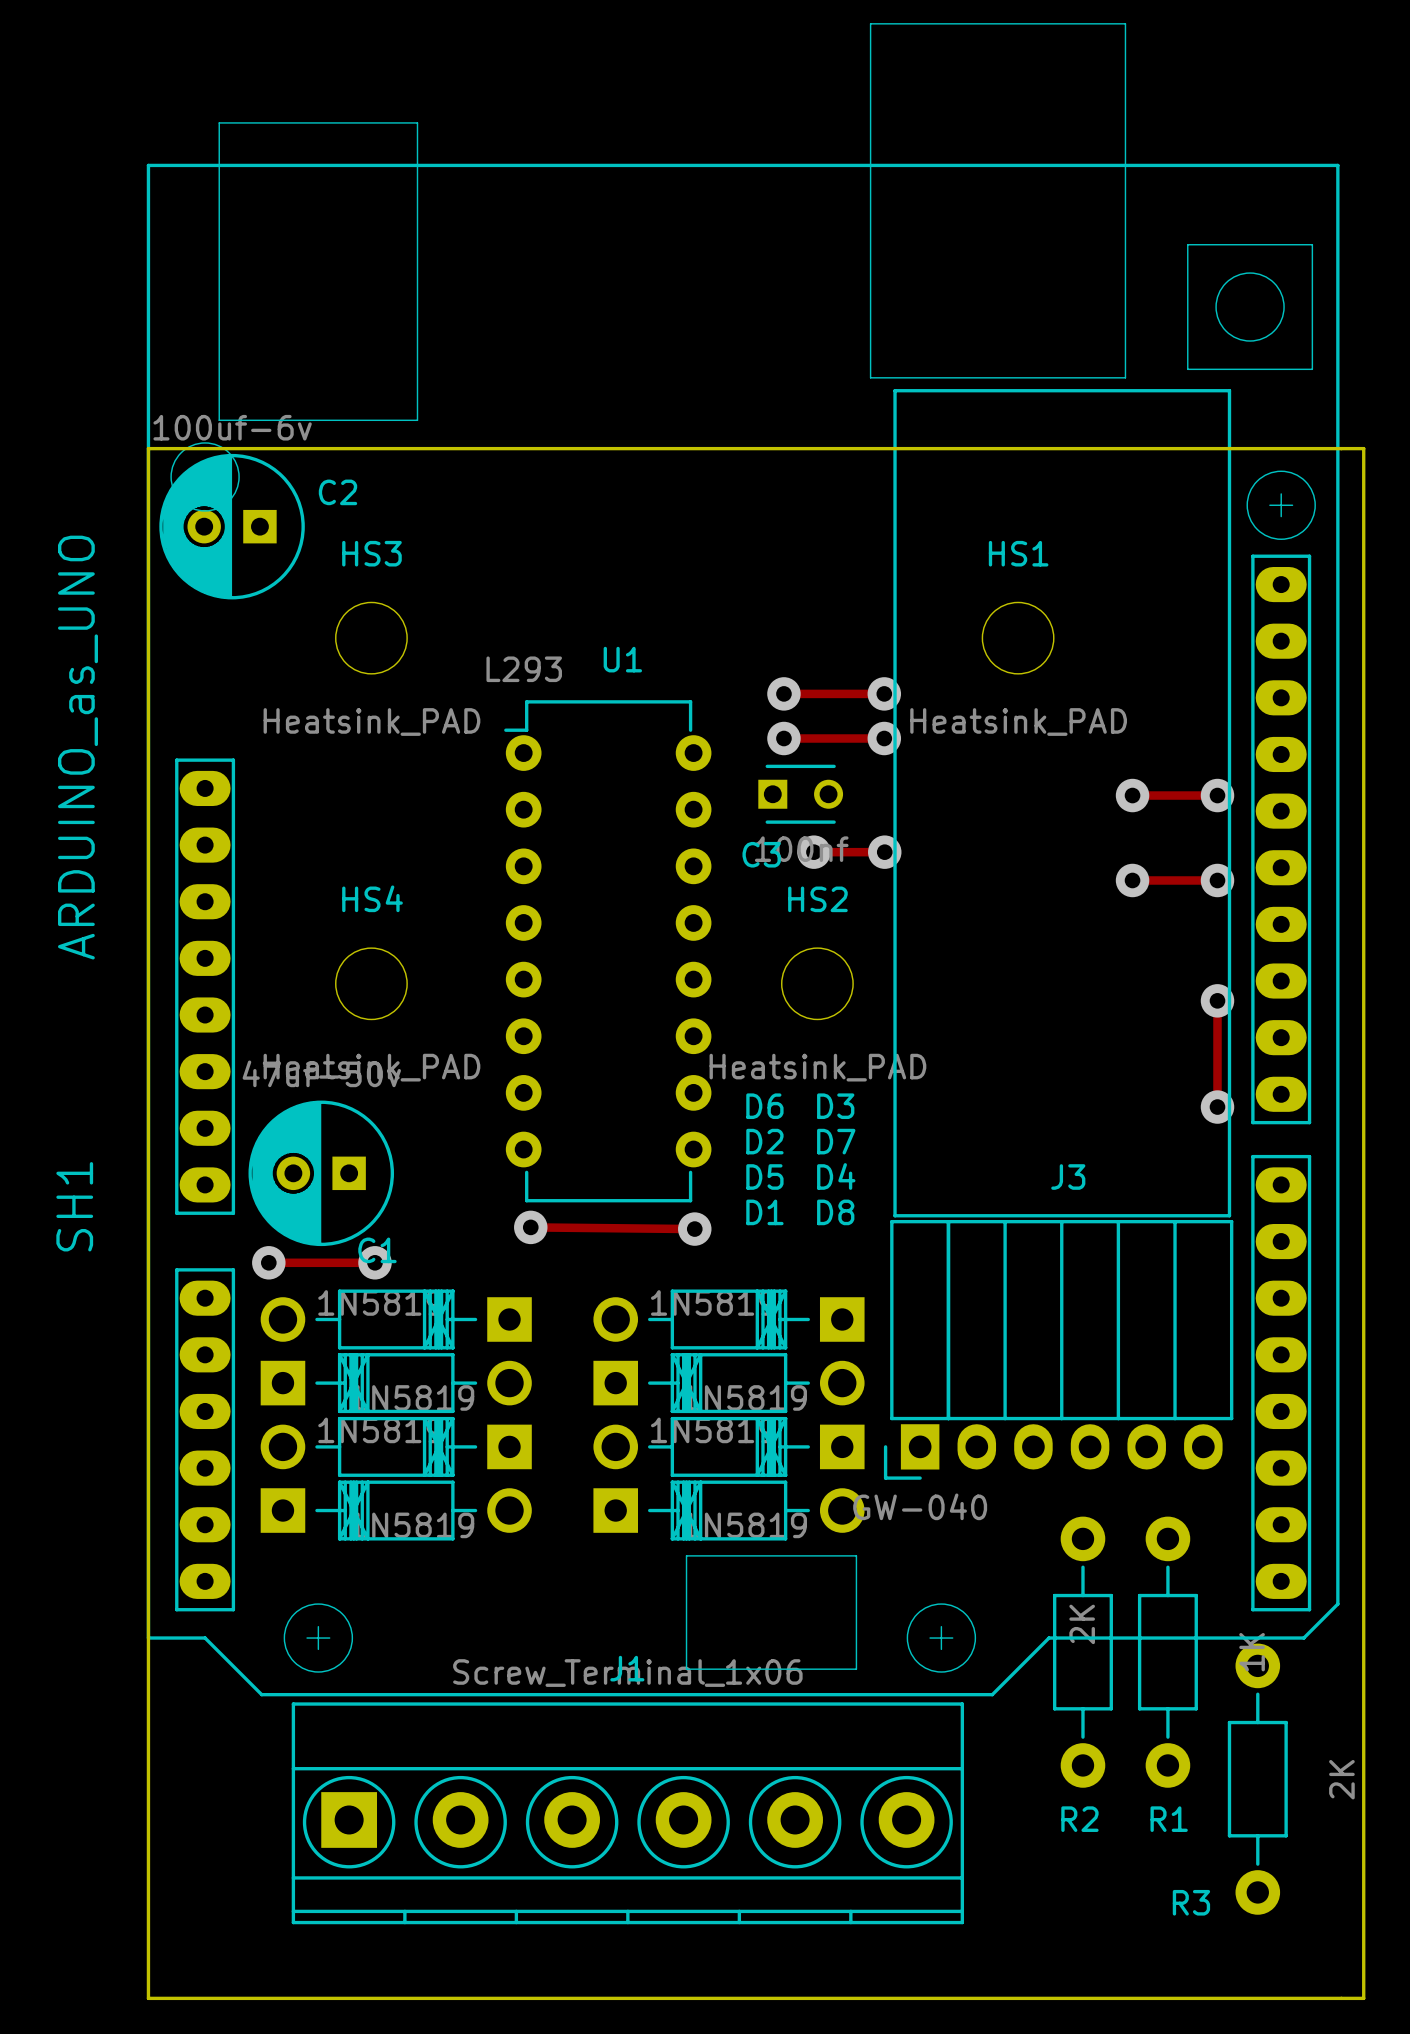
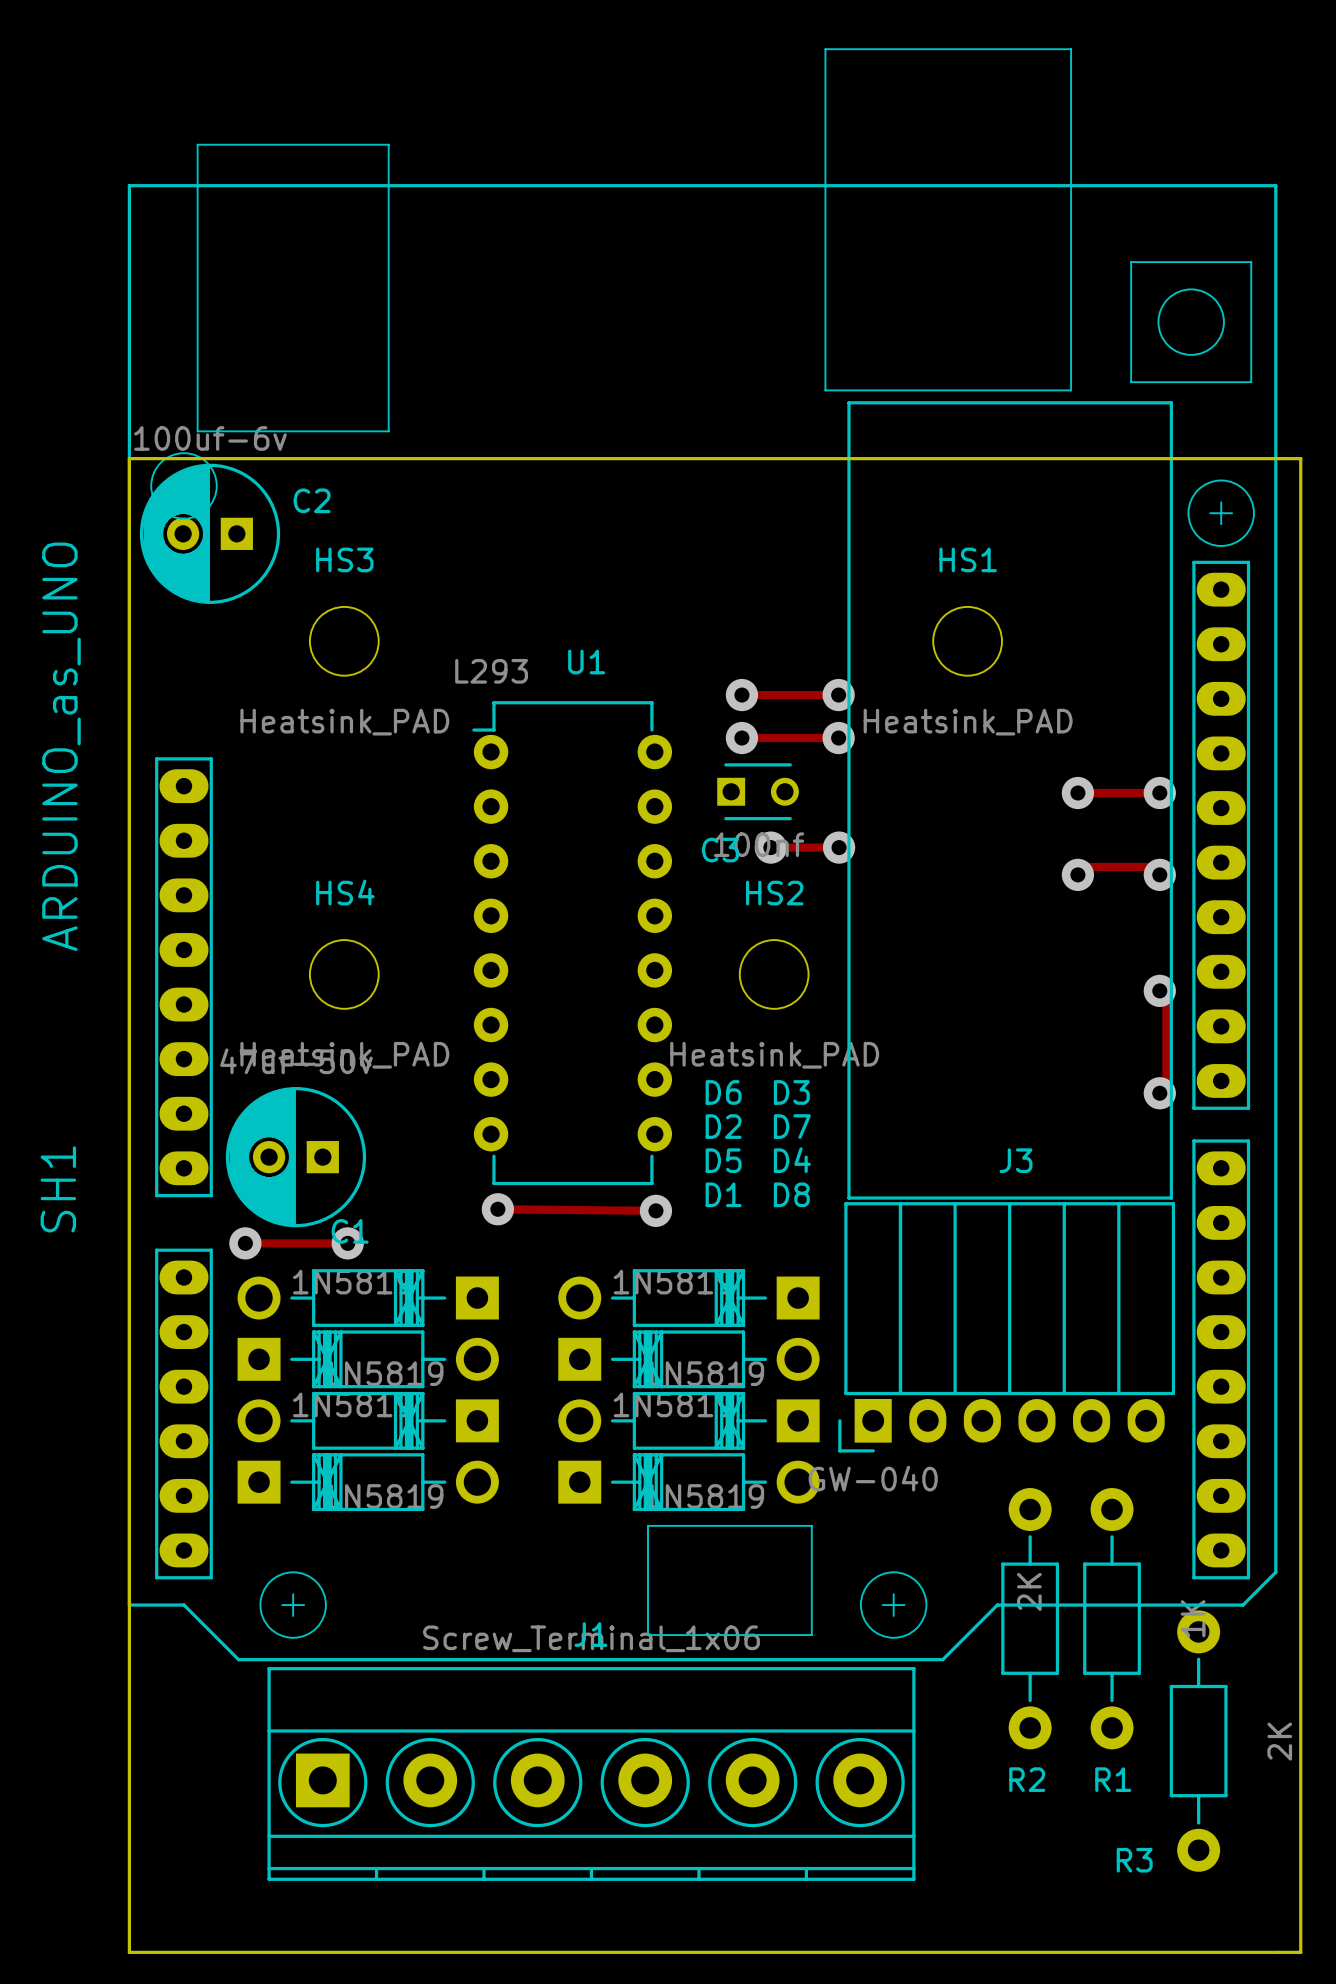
track: none -> (1080, 866) (1166, 866)
track: (1132, 880) (1217, 880) -> none
track: none -> (1166, 985) (1166, 1092)
track: (1217, 1000) (1217, 1107) -> none

